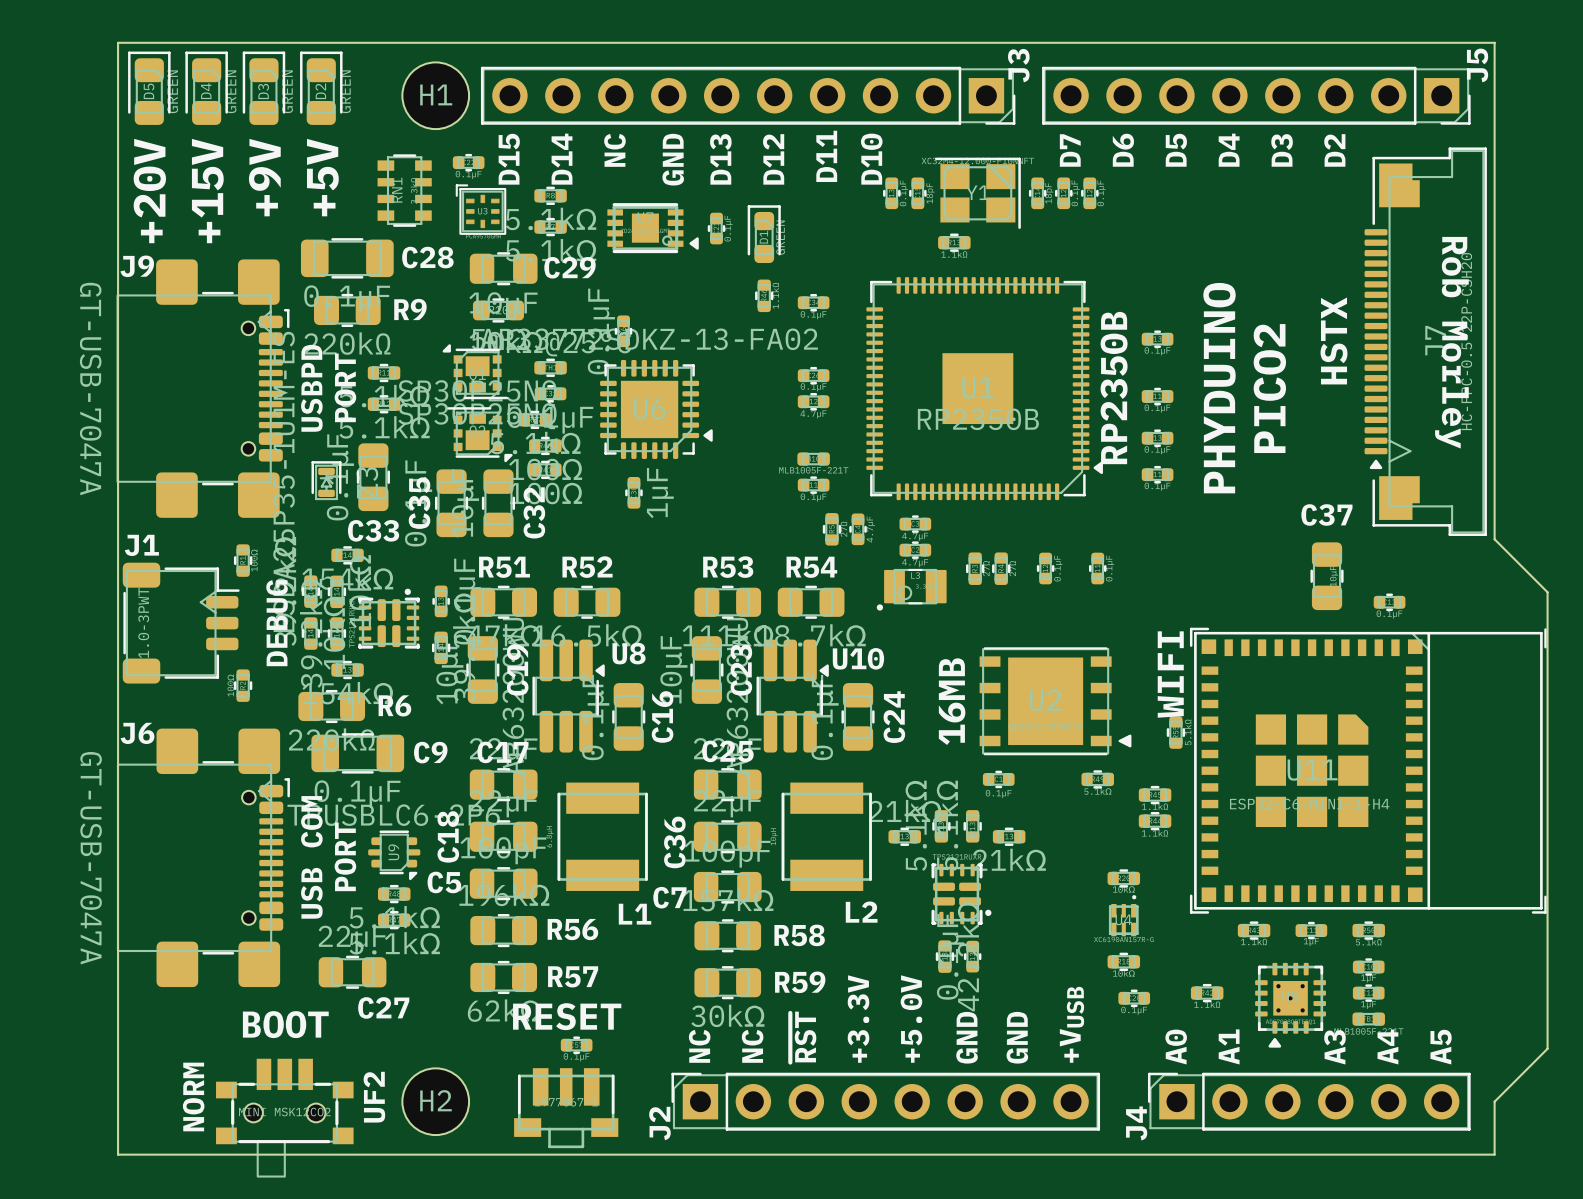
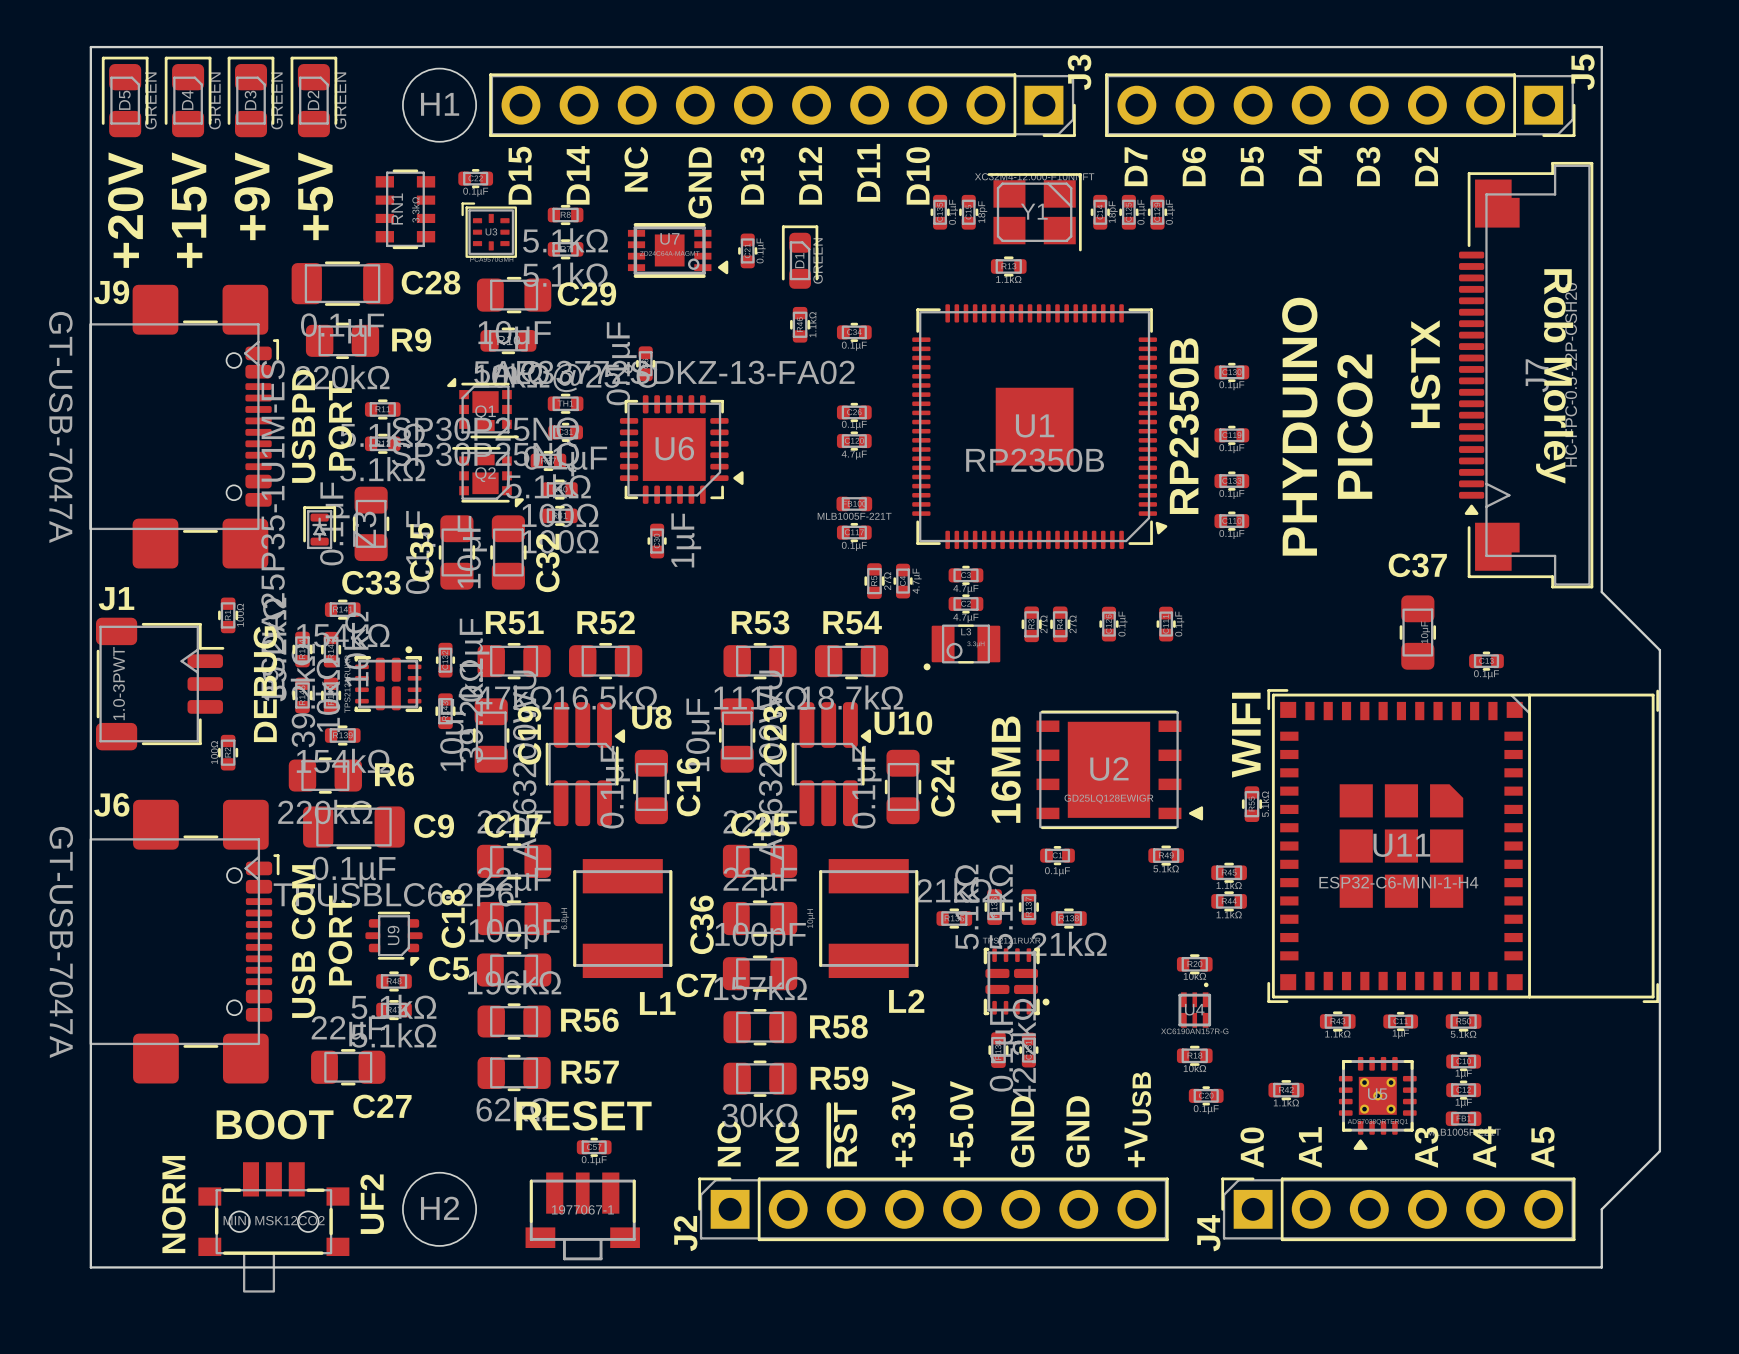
U1 footprint: [866, 277, 1103, 501] -> [912, 304, 1168, 550]

